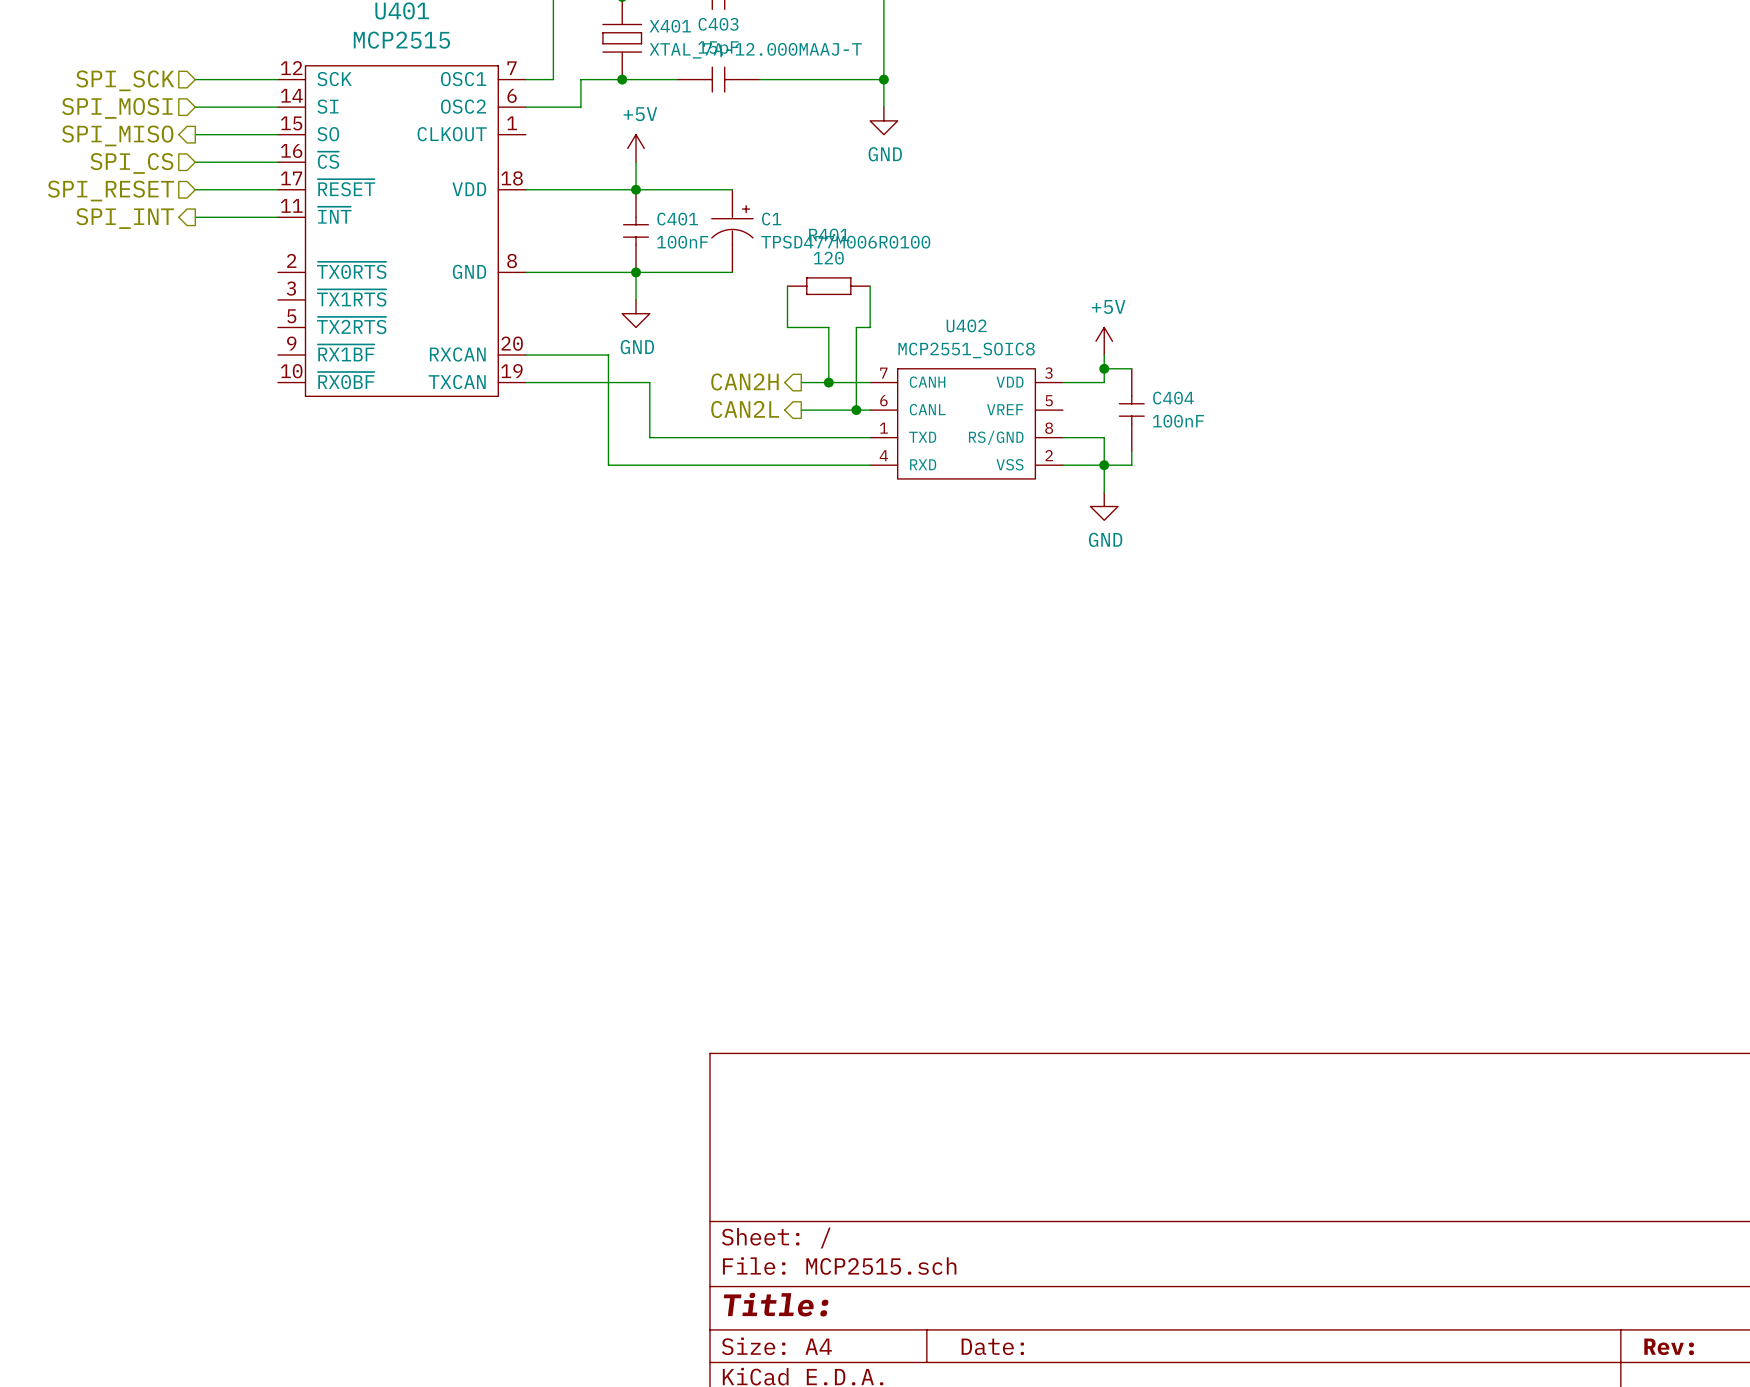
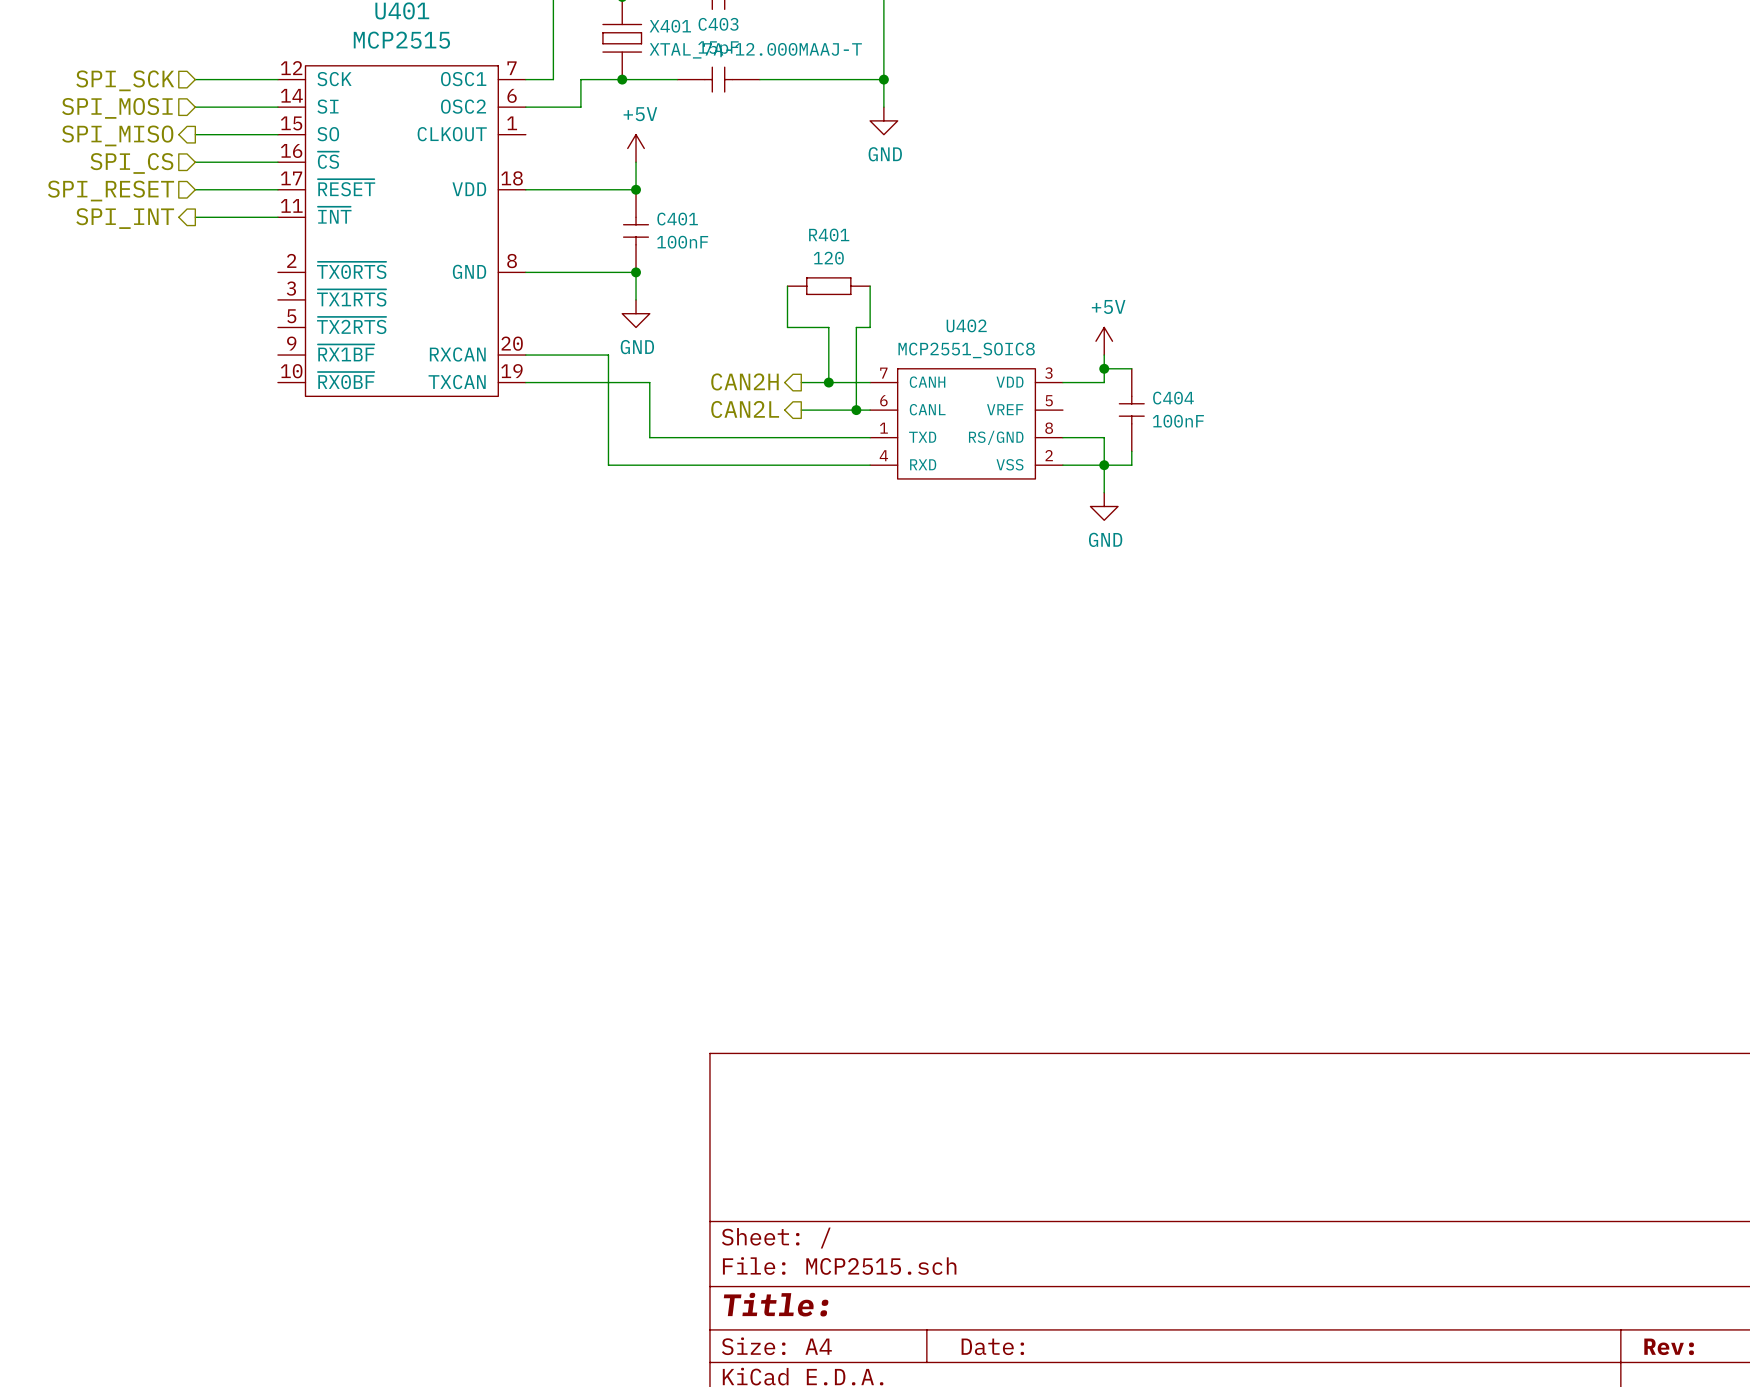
wire: (636, 189) (732, 189) -> none
C1: TPSD477M006R0100 (732, 231) -> none
wire: (636, 272) (732, 272) -> none

